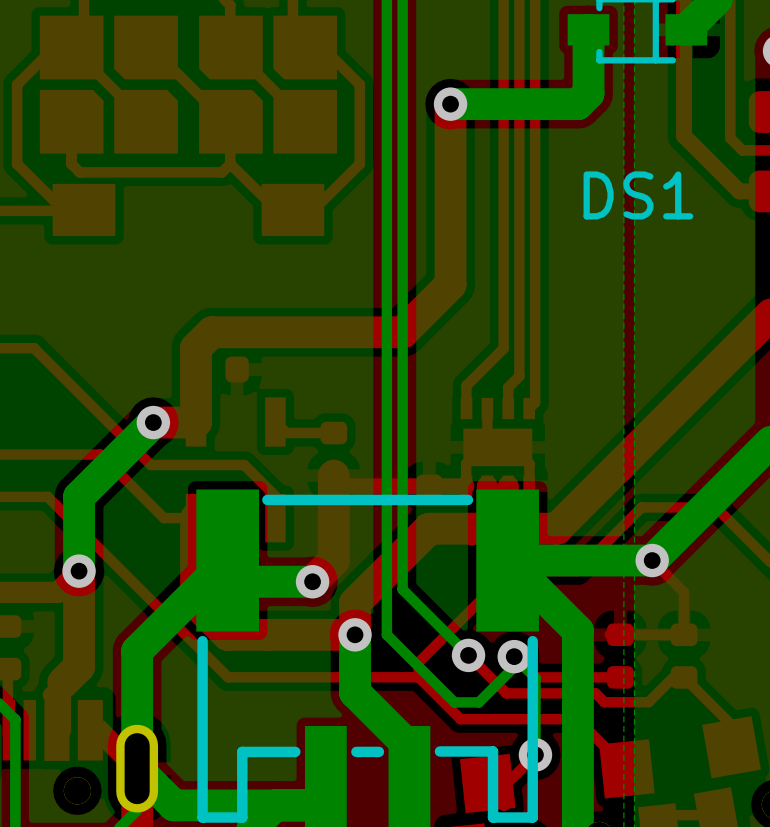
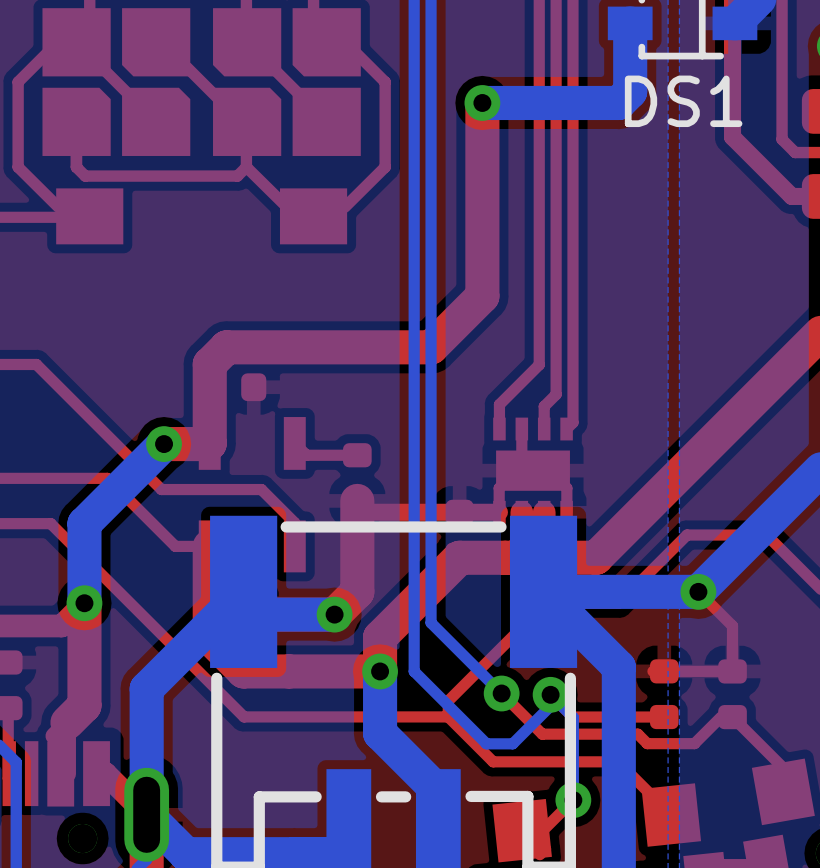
DS1 name position: DS1 (638, 195) -> DS1 (683, 101)

